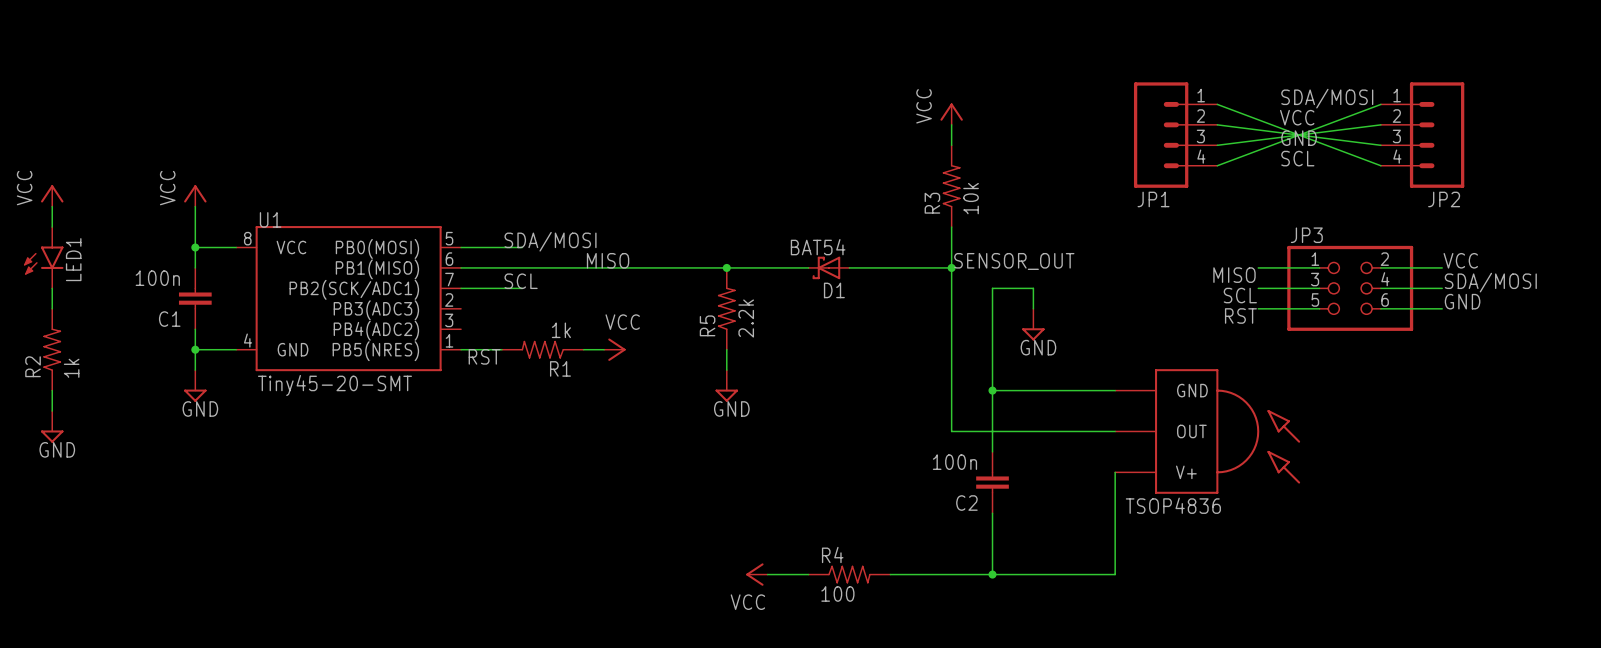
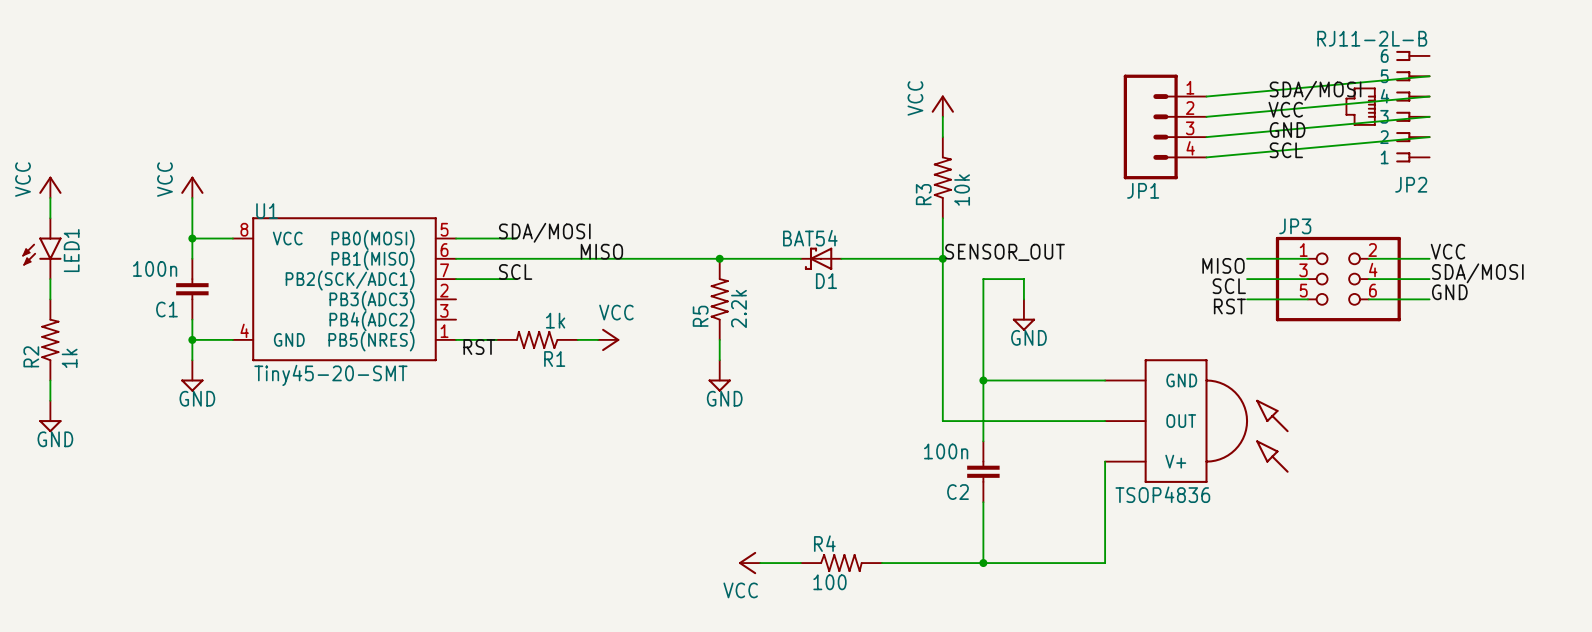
JP2 value: none -> RJ11-2L-B (1372, 38)
JP2 symbol: [1380, 82, 1465, 188] -> [1345, 50, 1430, 163]
wire: (1217, 104) (1380, 165) -> (1206, 96) (1429, 76)
wire: (1380, 104) (1217, 165) -> (1429, 137) (1206, 157)
wire: (1217, 124) (1380, 145) -> (1206, 116) (1429, 96)
wire: (1380, 124) (1217, 145) -> (1429, 116) (1206, 137)

